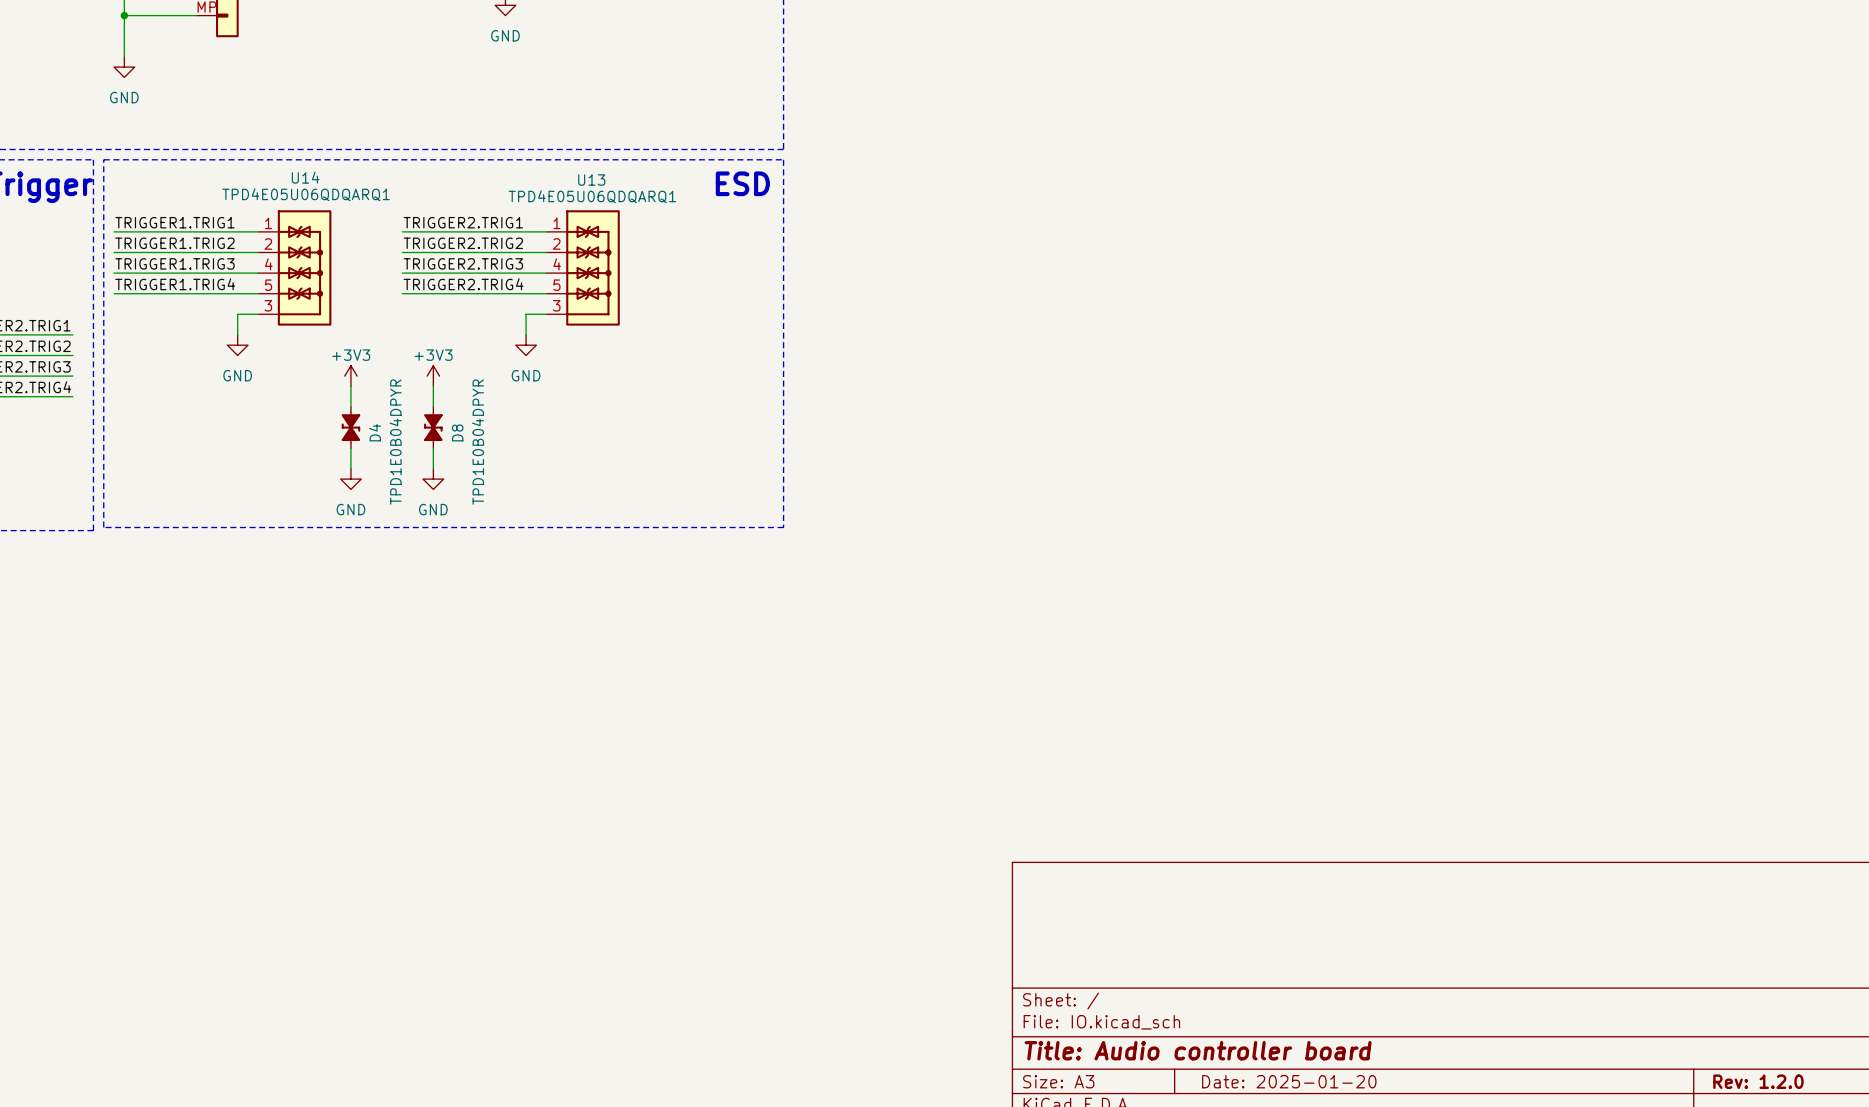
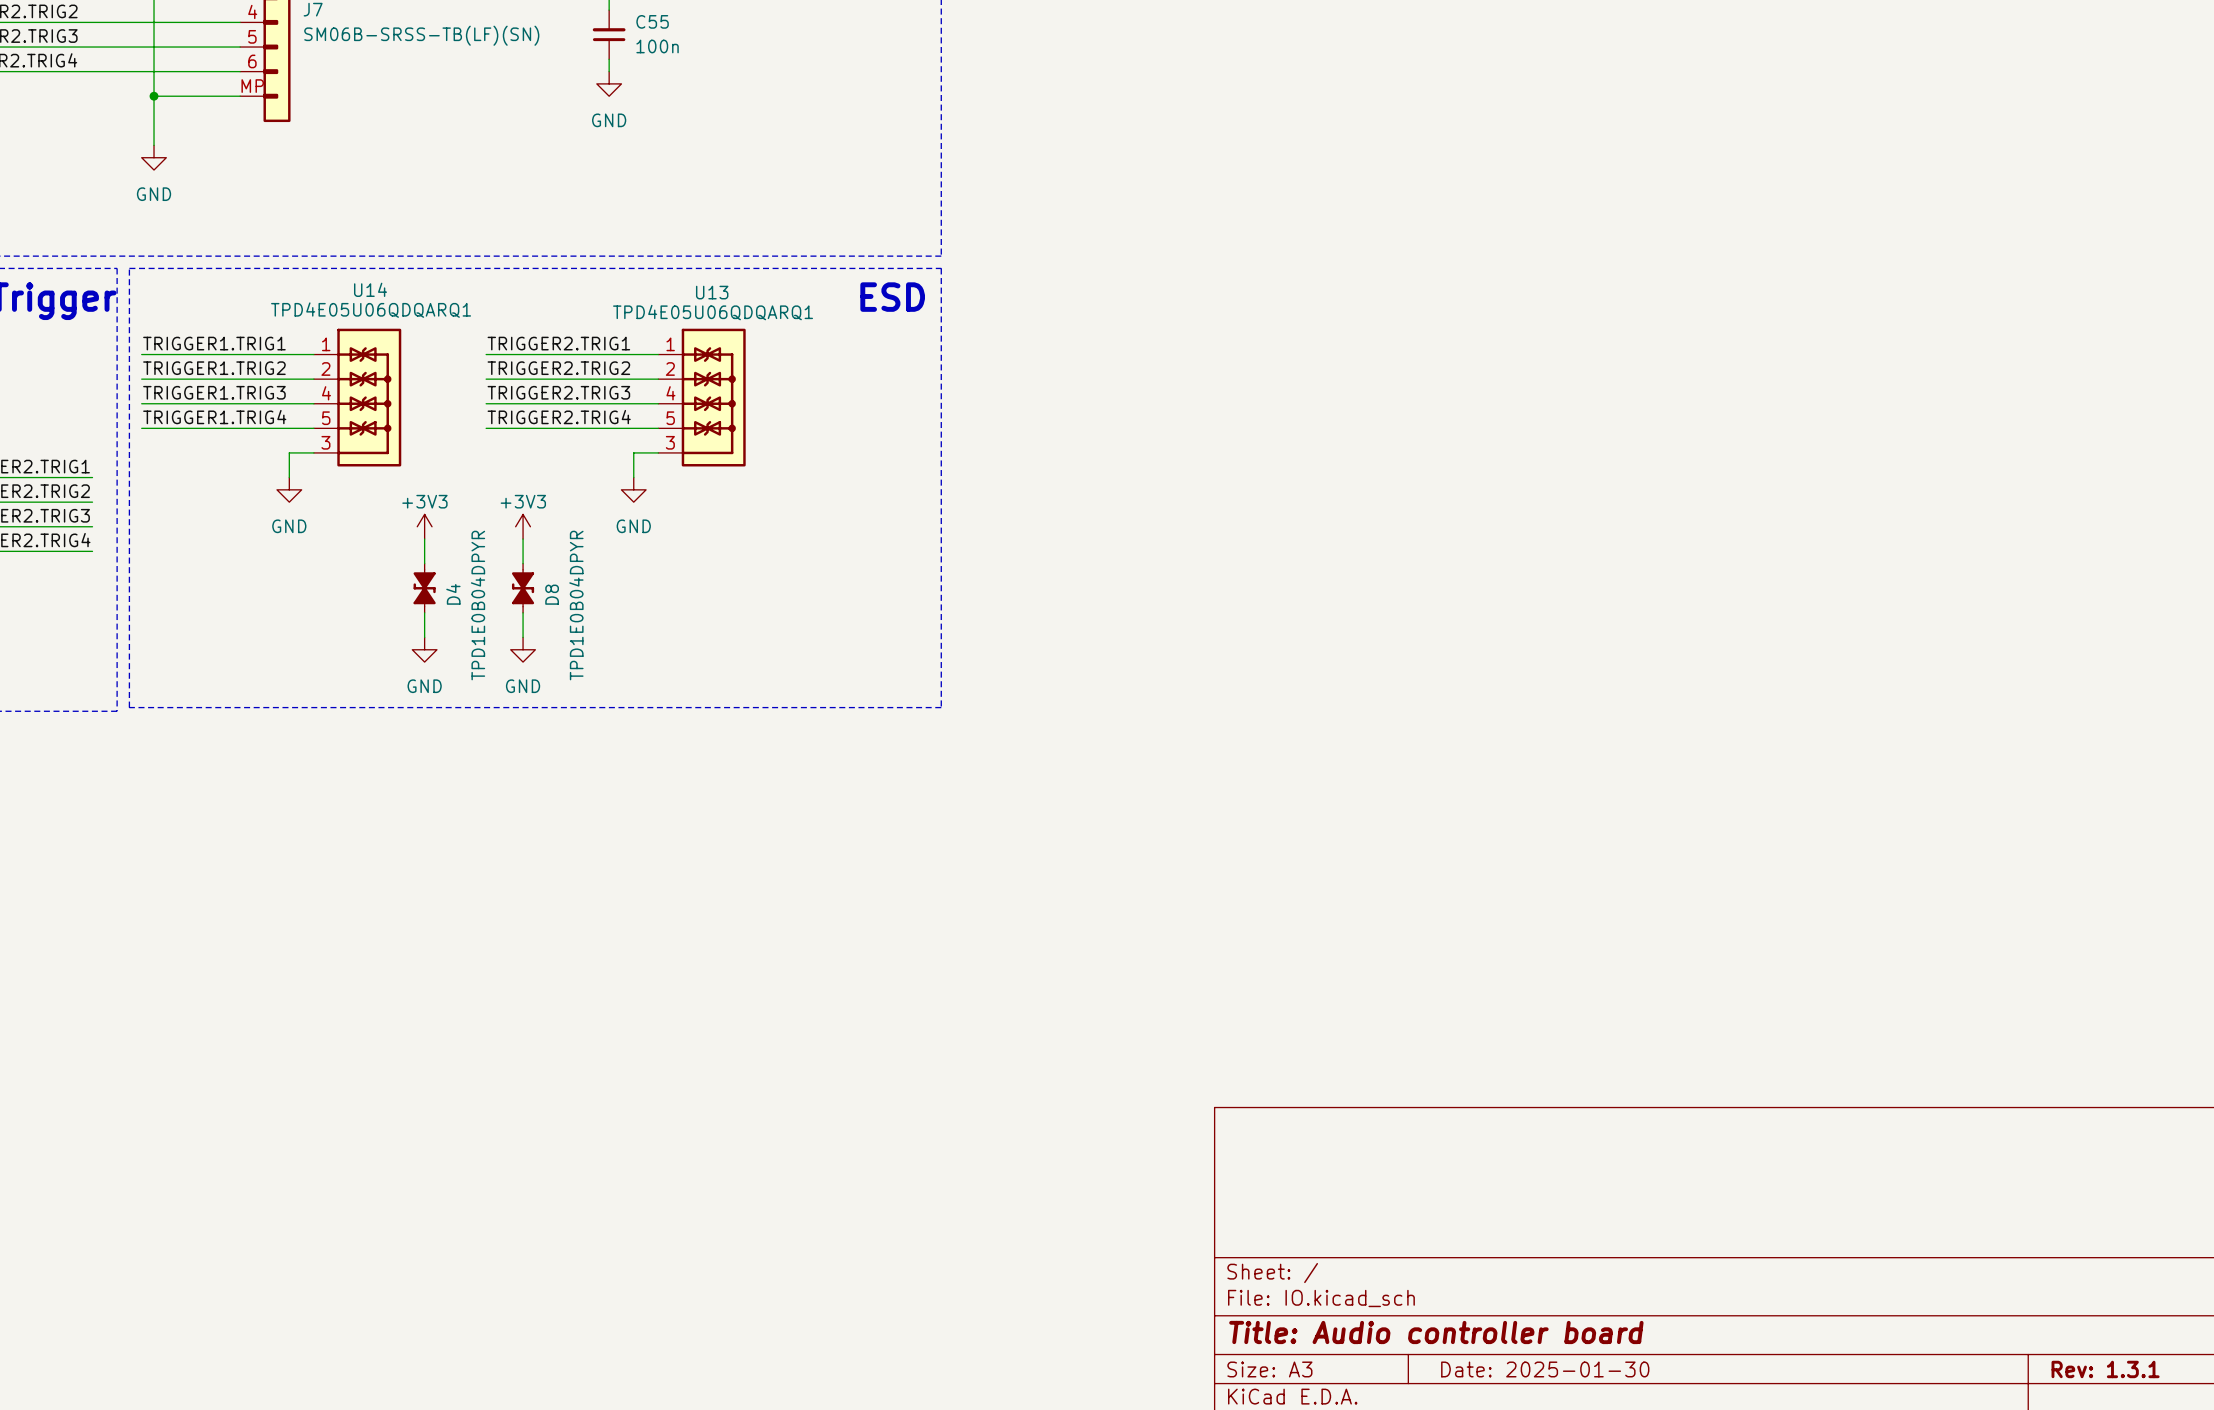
title block: Date: 2025-01-20 (1289, 1081) -> Date: 2025-01-30 (1545, 1369)
title block: Rev: 1.2.0 (1758, 1081) -> Rev: 1.3.1 (2105, 1369)

